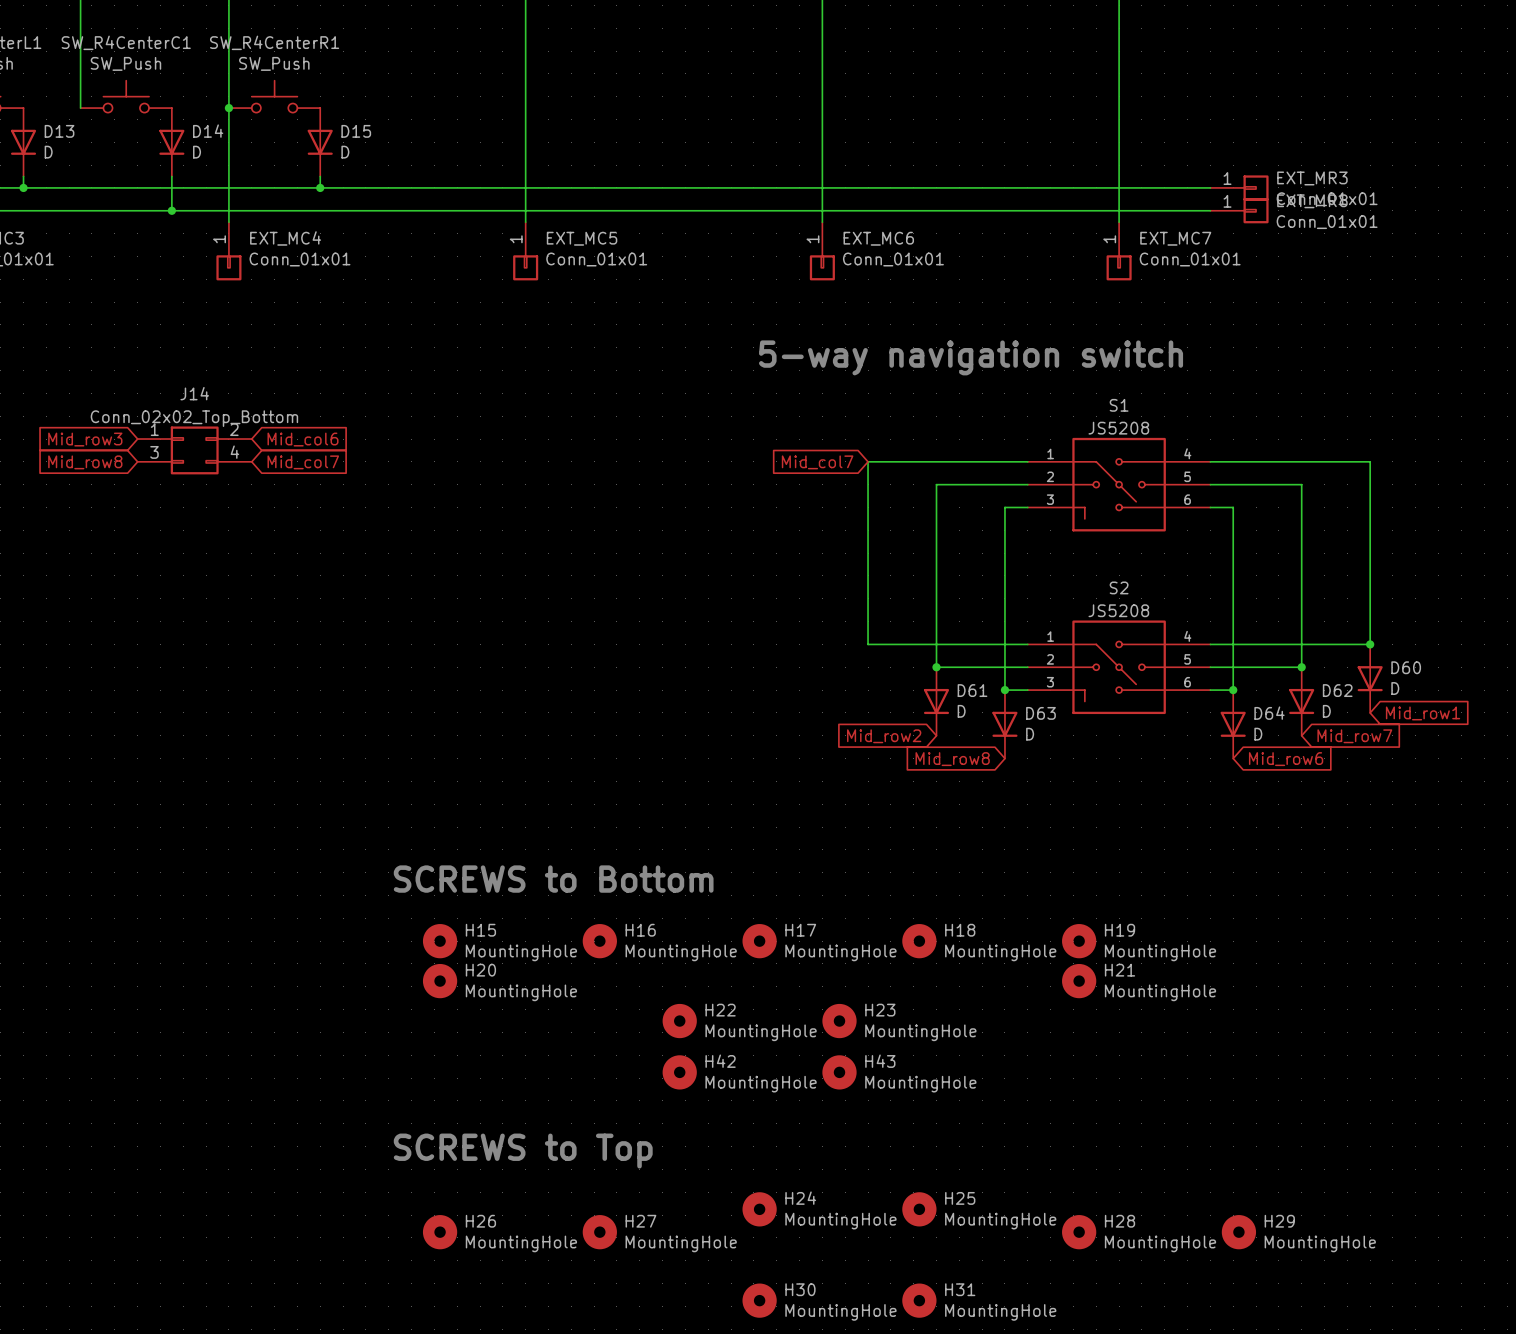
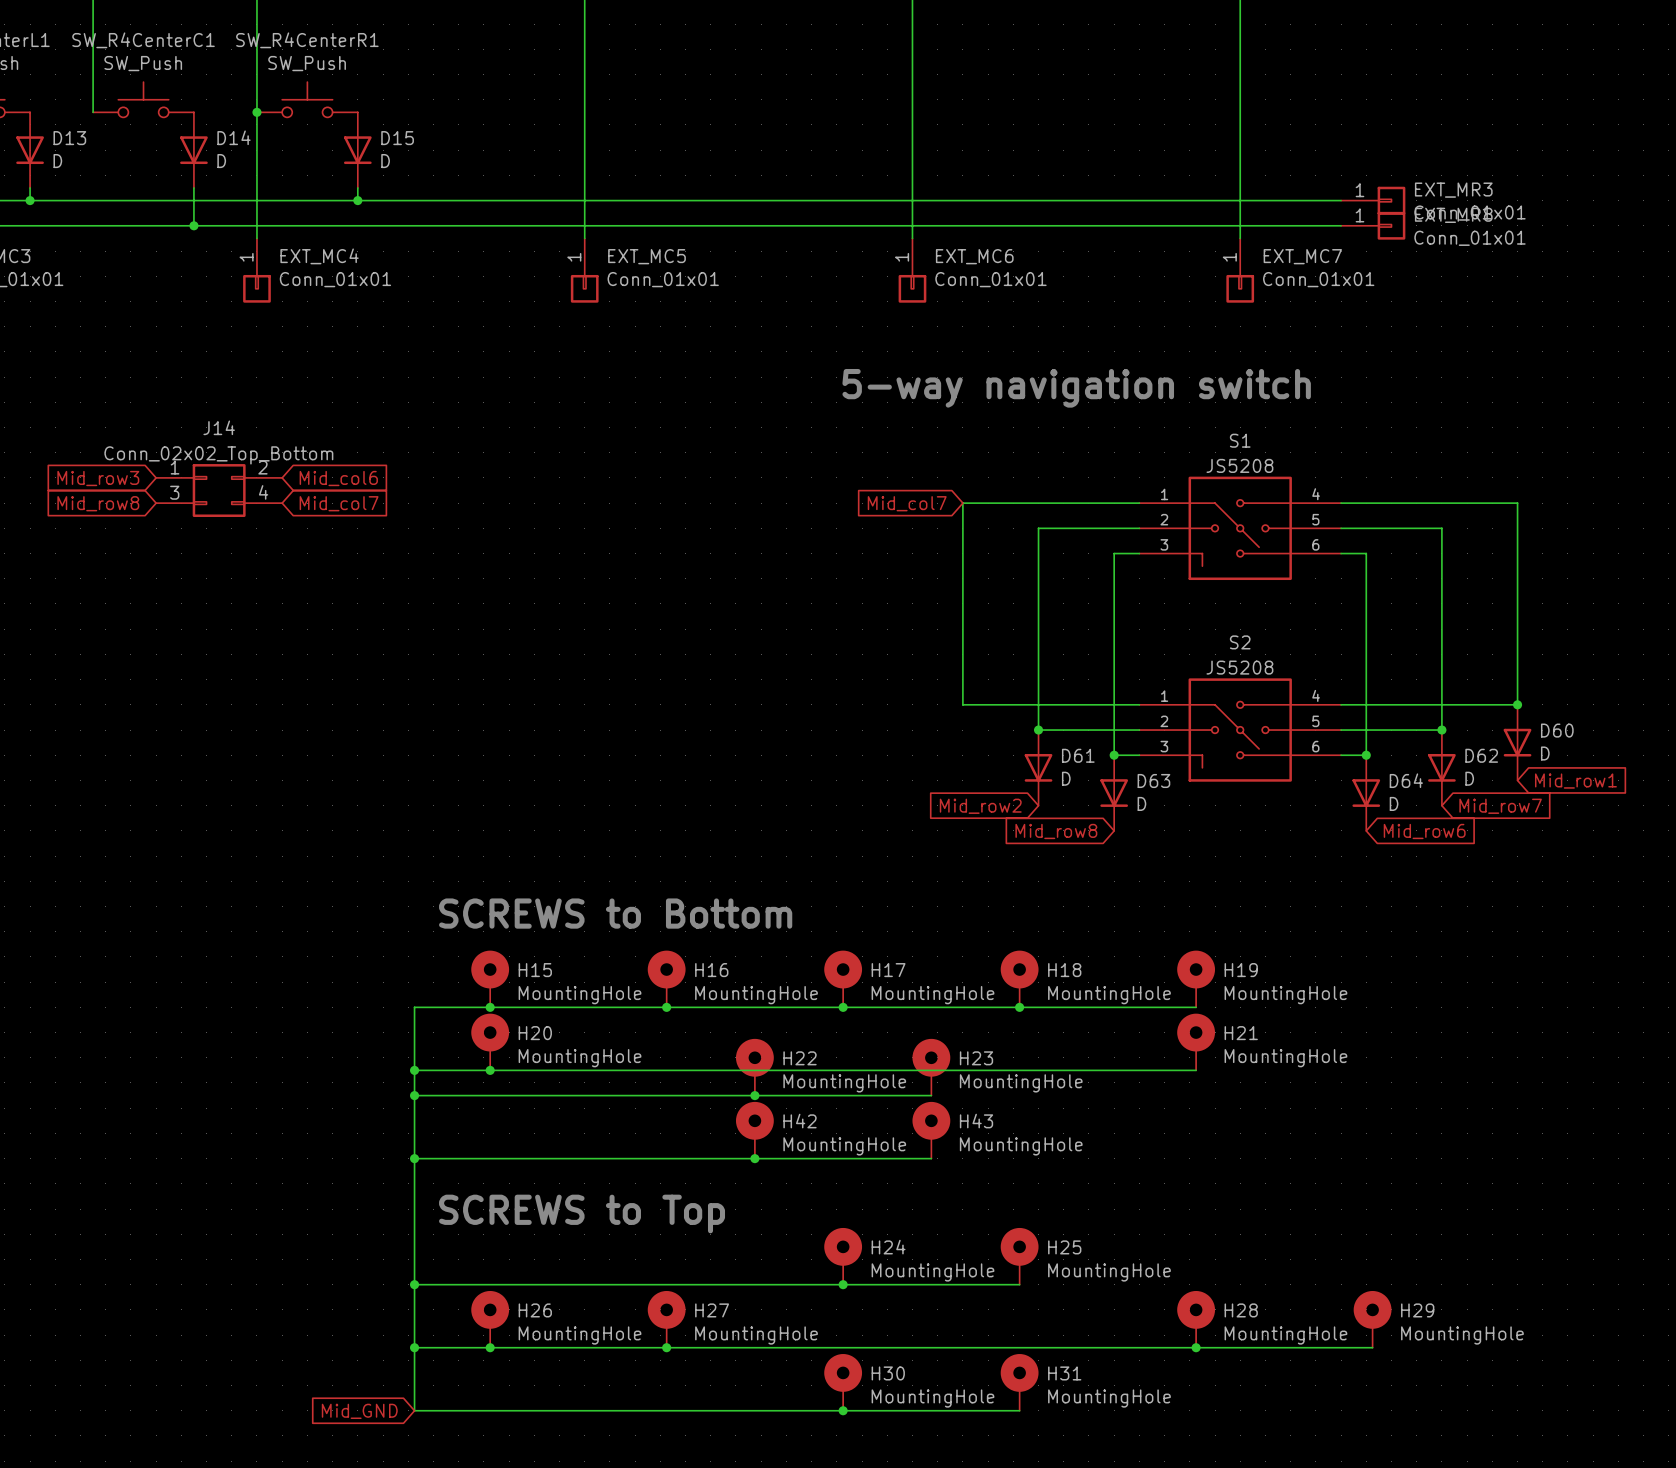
text position: SCREWS to Bottom (553, 879) -> SCREWS to Bottom (615, 913)
junction: none -> (490, 1007)
junction: none -> (666, 1007)
junction: none -> (843, 1007)
junction: none -> (1019, 1007)
wire: none -> (1196, 1007) (414, 1007) (414, 1410) (1019, 1410)
H15 symbol: [422, 924, 458, 959] -> [471, 950, 510, 1008]
H16 symbol: [582, 924, 617, 959] -> [647, 950, 686, 1008]
H17 symbol: [742, 924, 777, 959] -> [824, 950, 863, 1008]
H18 symbol: [902, 924, 937, 959] -> [1000, 950, 1039, 1008]
H19 symbol: [1062, 924, 1097, 959] -> [1177, 950, 1216, 1008]
H20 symbol: [422, 963, 458, 999] -> [471, 1013, 510, 1071]
H21 symbol: [1062, 963, 1097, 999] -> [1177, 1013, 1216, 1071]
wire: none -> (414, 1070) (1196, 1070)
junction: none -> (414, 1070)
junction: none -> (490, 1070)
wire: none -> (414, 1095) (931, 1095)
junction: none -> (414, 1095)
junction: none -> (754, 1095)
H22 symbol: [662, 1003, 697, 1039] -> [735, 1038, 774, 1096]
H23 symbol: [822, 1003, 857, 1039] -> [912, 1038, 951, 1096]
wire: none -> (414, 1158) (931, 1158)
junction: none -> (414, 1158)
H42 symbol: [662, 1055, 697, 1090] -> [735, 1101, 774, 1159]
junction: none -> (754, 1158)
H43 symbol: [822, 1055, 857, 1090] -> [912, 1101, 951, 1159]
text position: SCREWS to Top (523, 1151) -> SCREWS to Top (582, 1213)
wire: none -> (414, 1284) (1019, 1284)
junction: none -> (414, 1284)
junction: none -> (843, 1284)
H24 symbol: [742, 1192, 777, 1227] -> [824, 1227, 863, 1285]
H25 symbol: [902, 1192, 937, 1227] -> [1000, 1227, 1039, 1285]
H26 symbol: [422, 1215, 458, 1250] -> [471, 1290, 510, 1348]
H27 symbol: [582, 1215, 617, 1250] -> [647, 1290, 686, 1348]
H28 symbol: [1062, 1215, 1097, 1250] -> [1177, 1290, 1216, 1348]
H29 symbol: [1221, 1215, 1257, 1250] -> [1353, 1290, 1392, 1348]
wire: none -> (414, 1347) (1372, 1347)
junction: none -> (414, 1347)
junction: none -> (490, 1347)
junction: none -> (666, 1347)
junction: none -> (1196, 1347)
H30 symbol: [742, 1283, 777, 1318] -> [824, 1354, 863, 1411]
junction: none -> (843, 1410)
H31 symbol: [902, 1283, 937, 1318] -> [1000, 1354, 1039, 1411]
global label: none -> Mid_GND (359, 1411)

